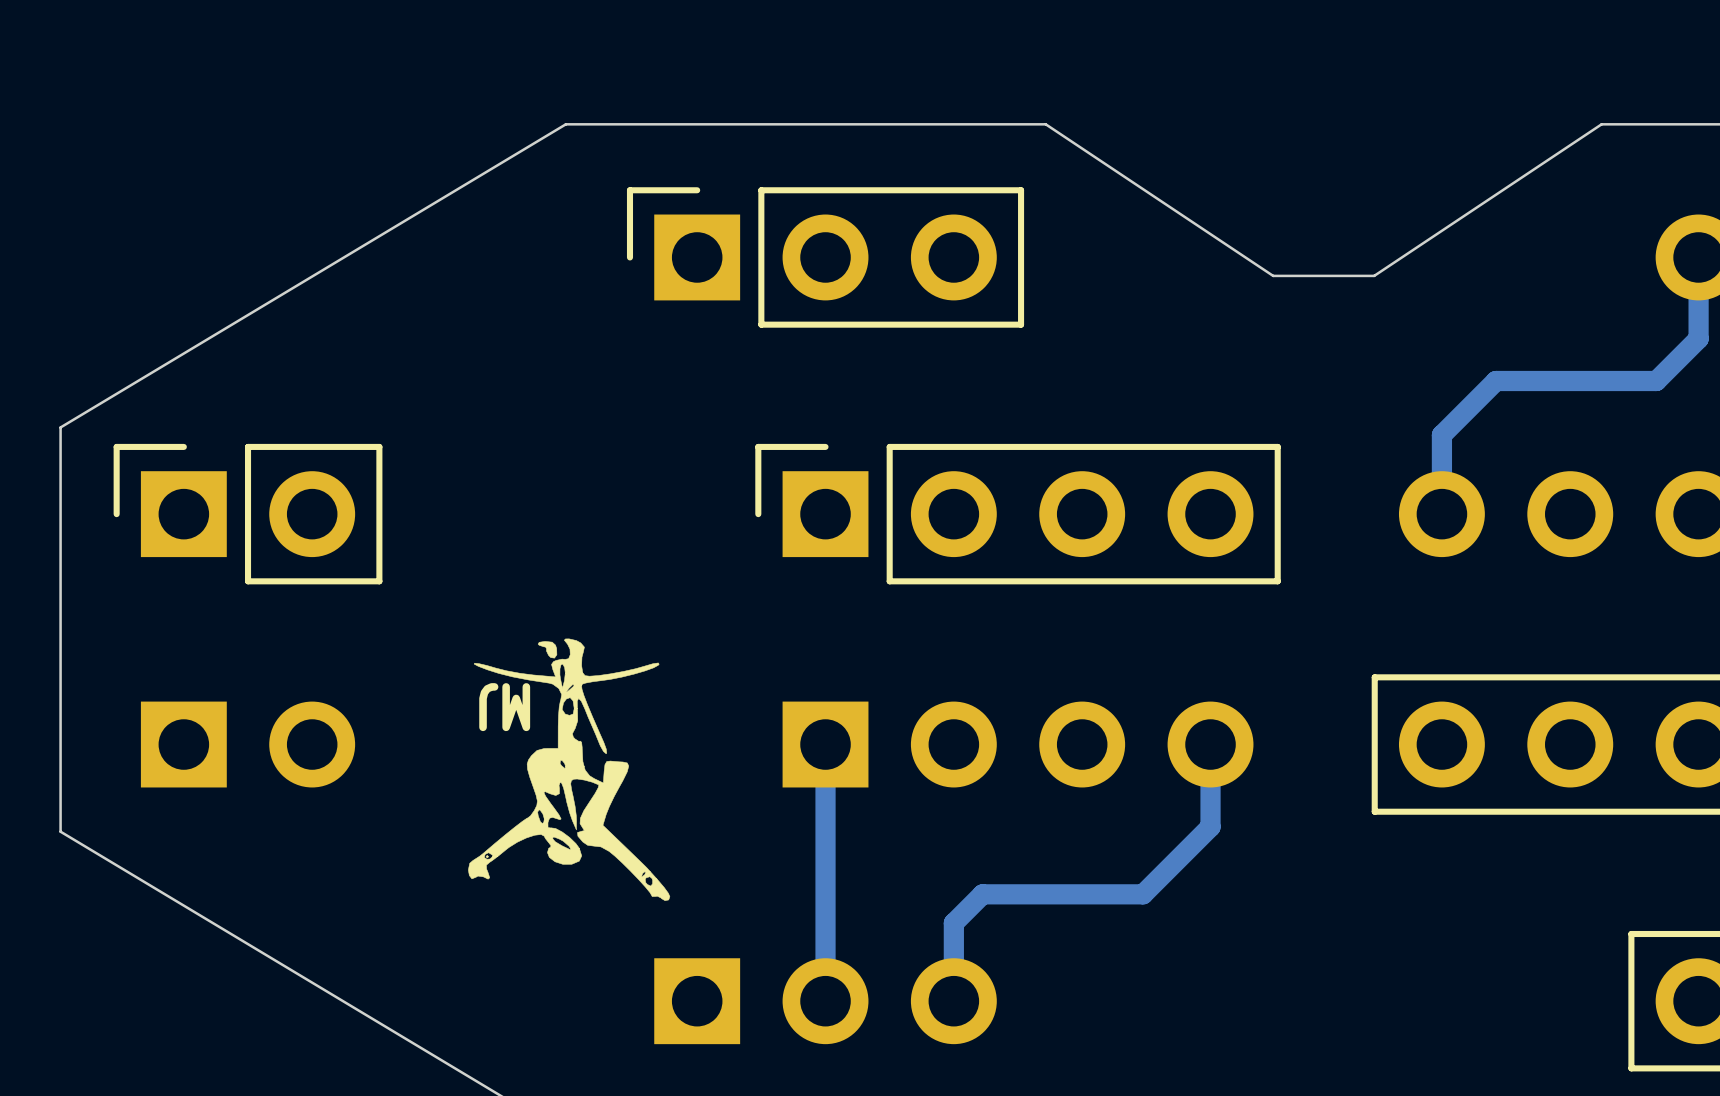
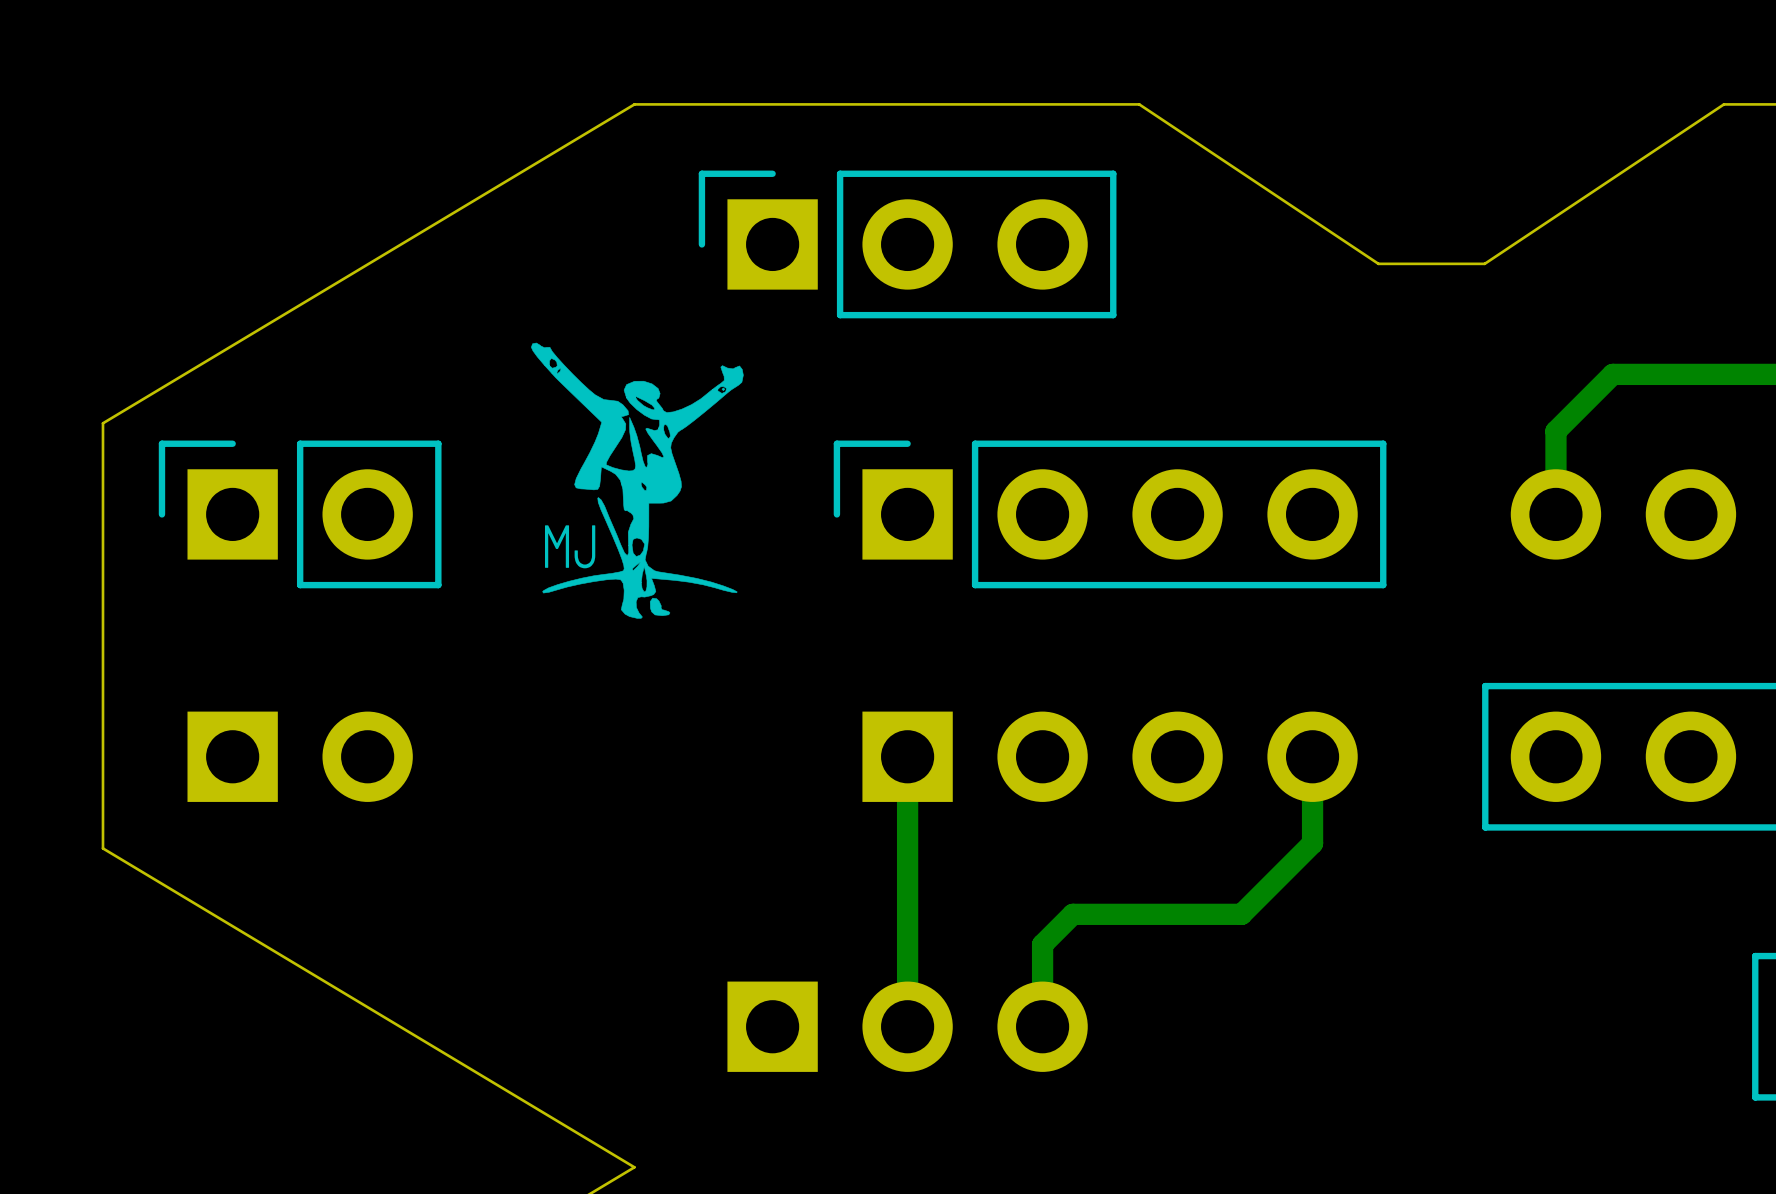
drawing: none -> [531, 342, 744, 619]
drawing: [468, 638, 671, 901] -> none
text rotation: 0° (504, 707) -> 180° (570, 546)
text position: MJ (504, 707) -> MJ (570, 546)

